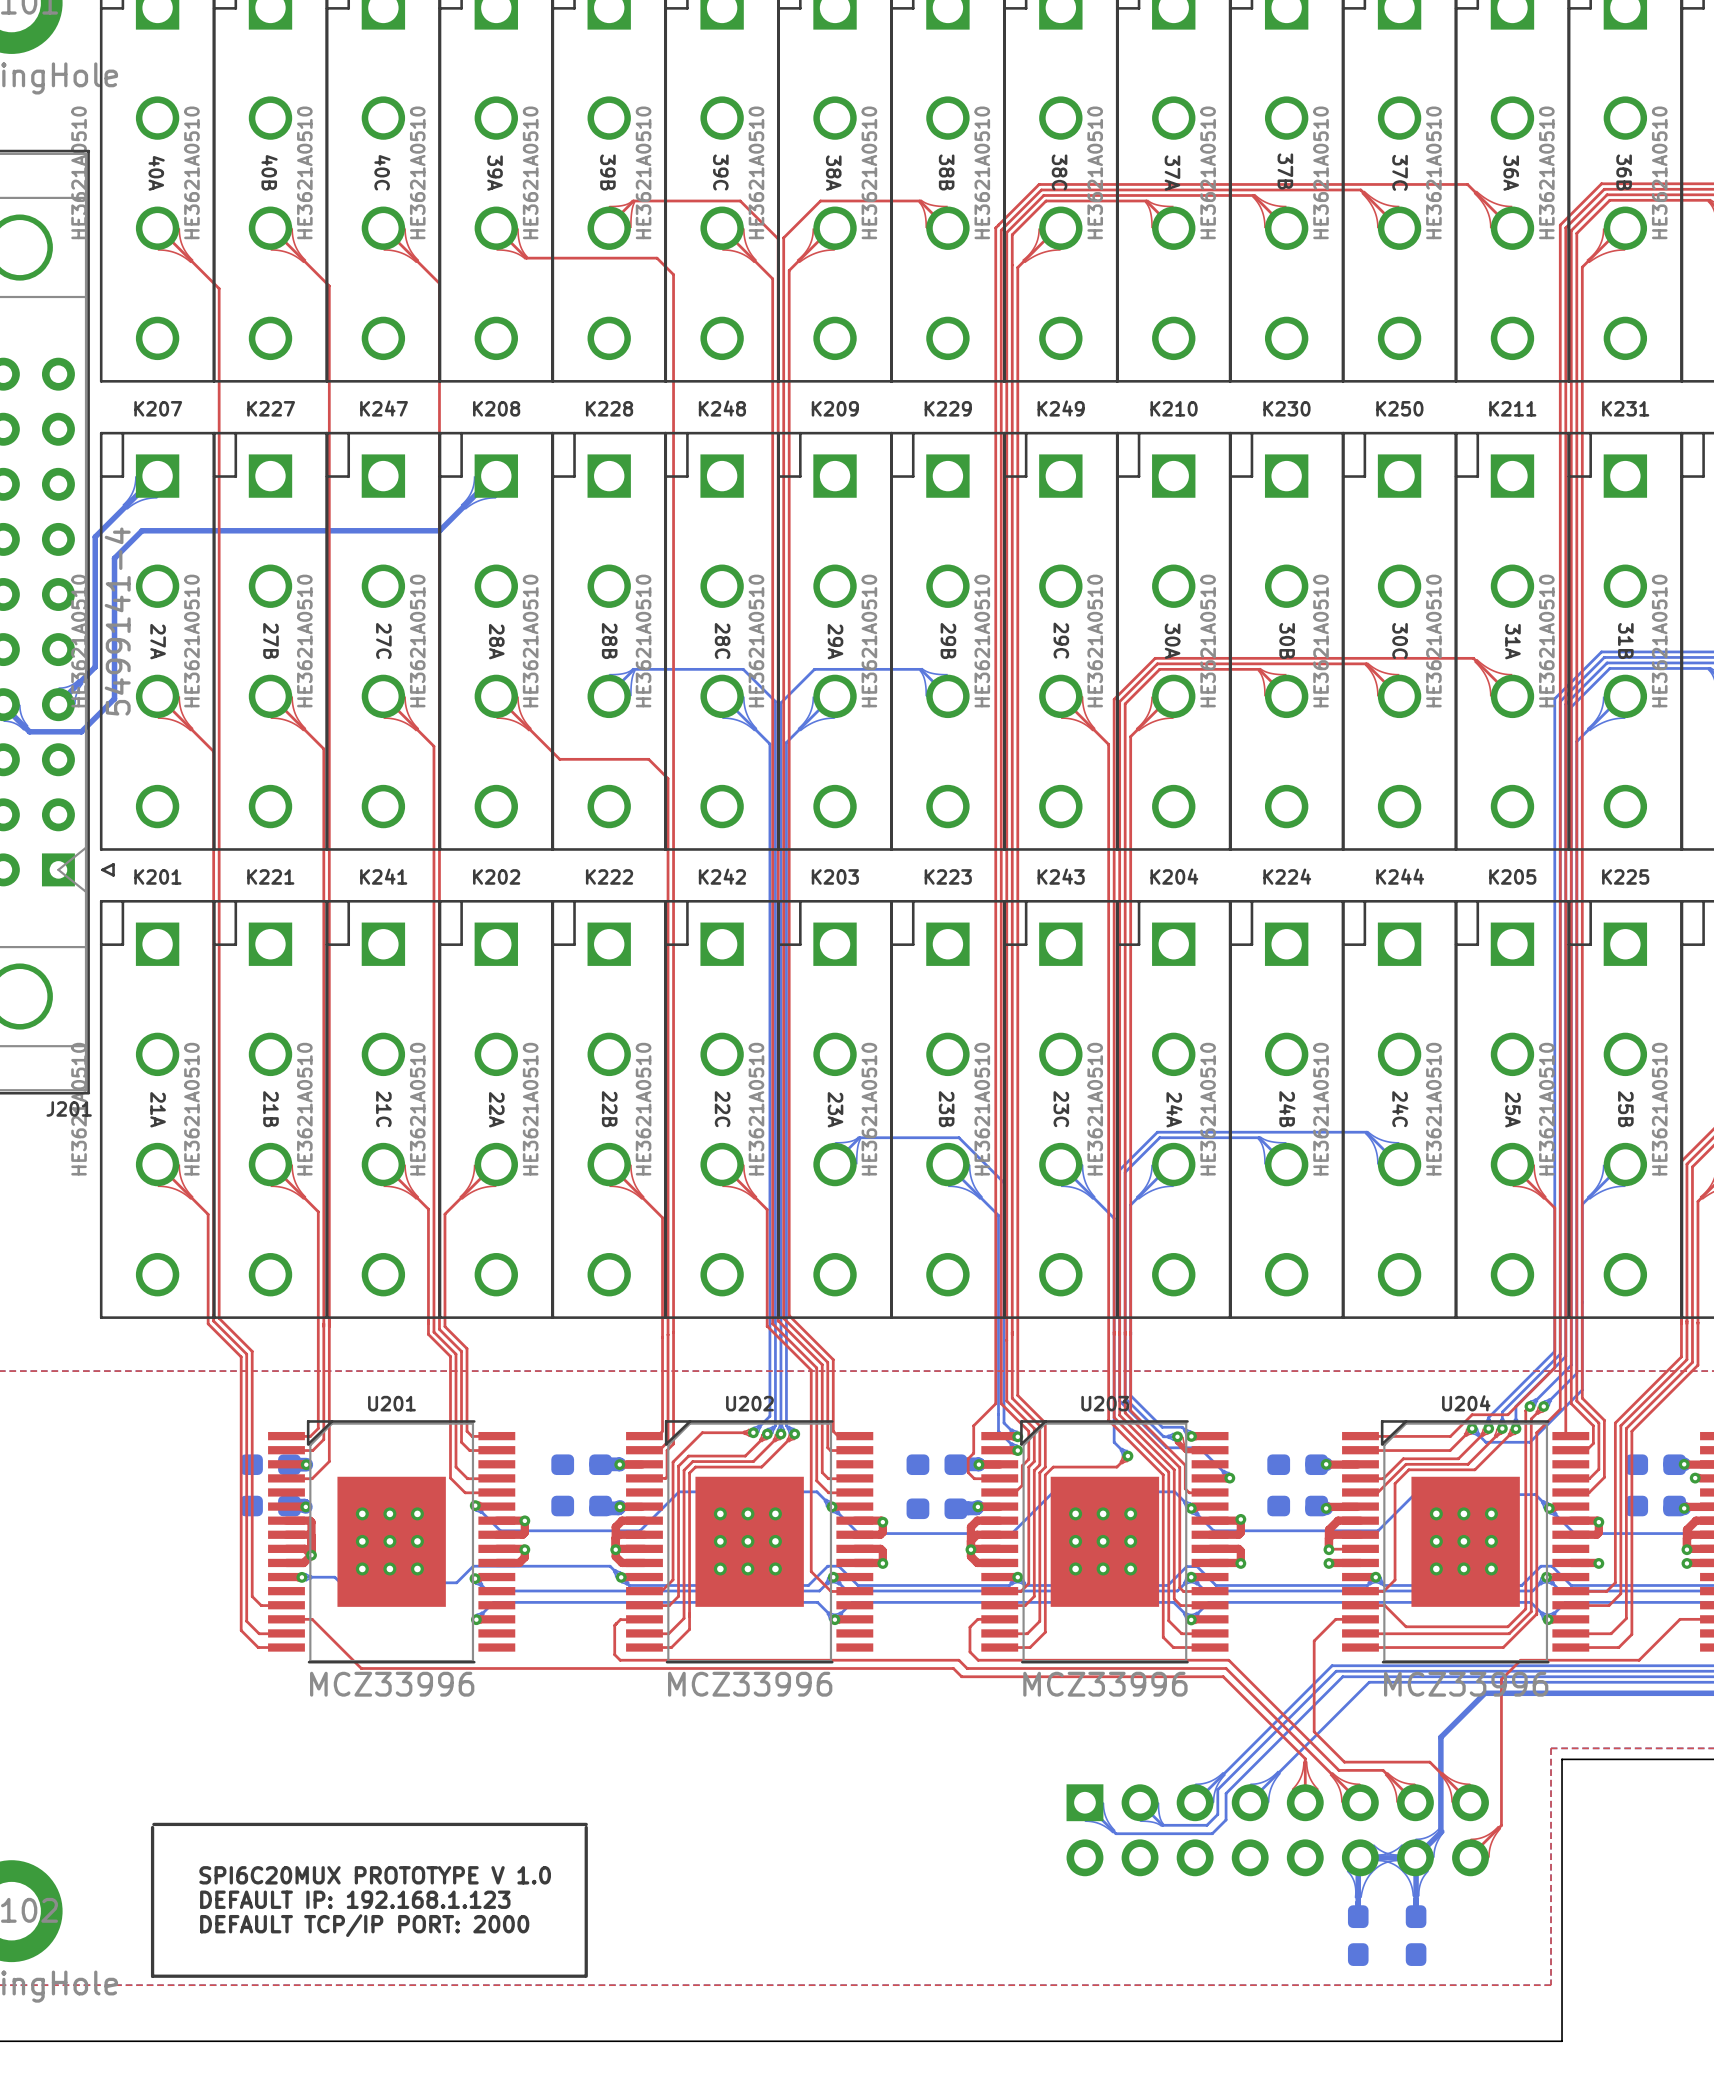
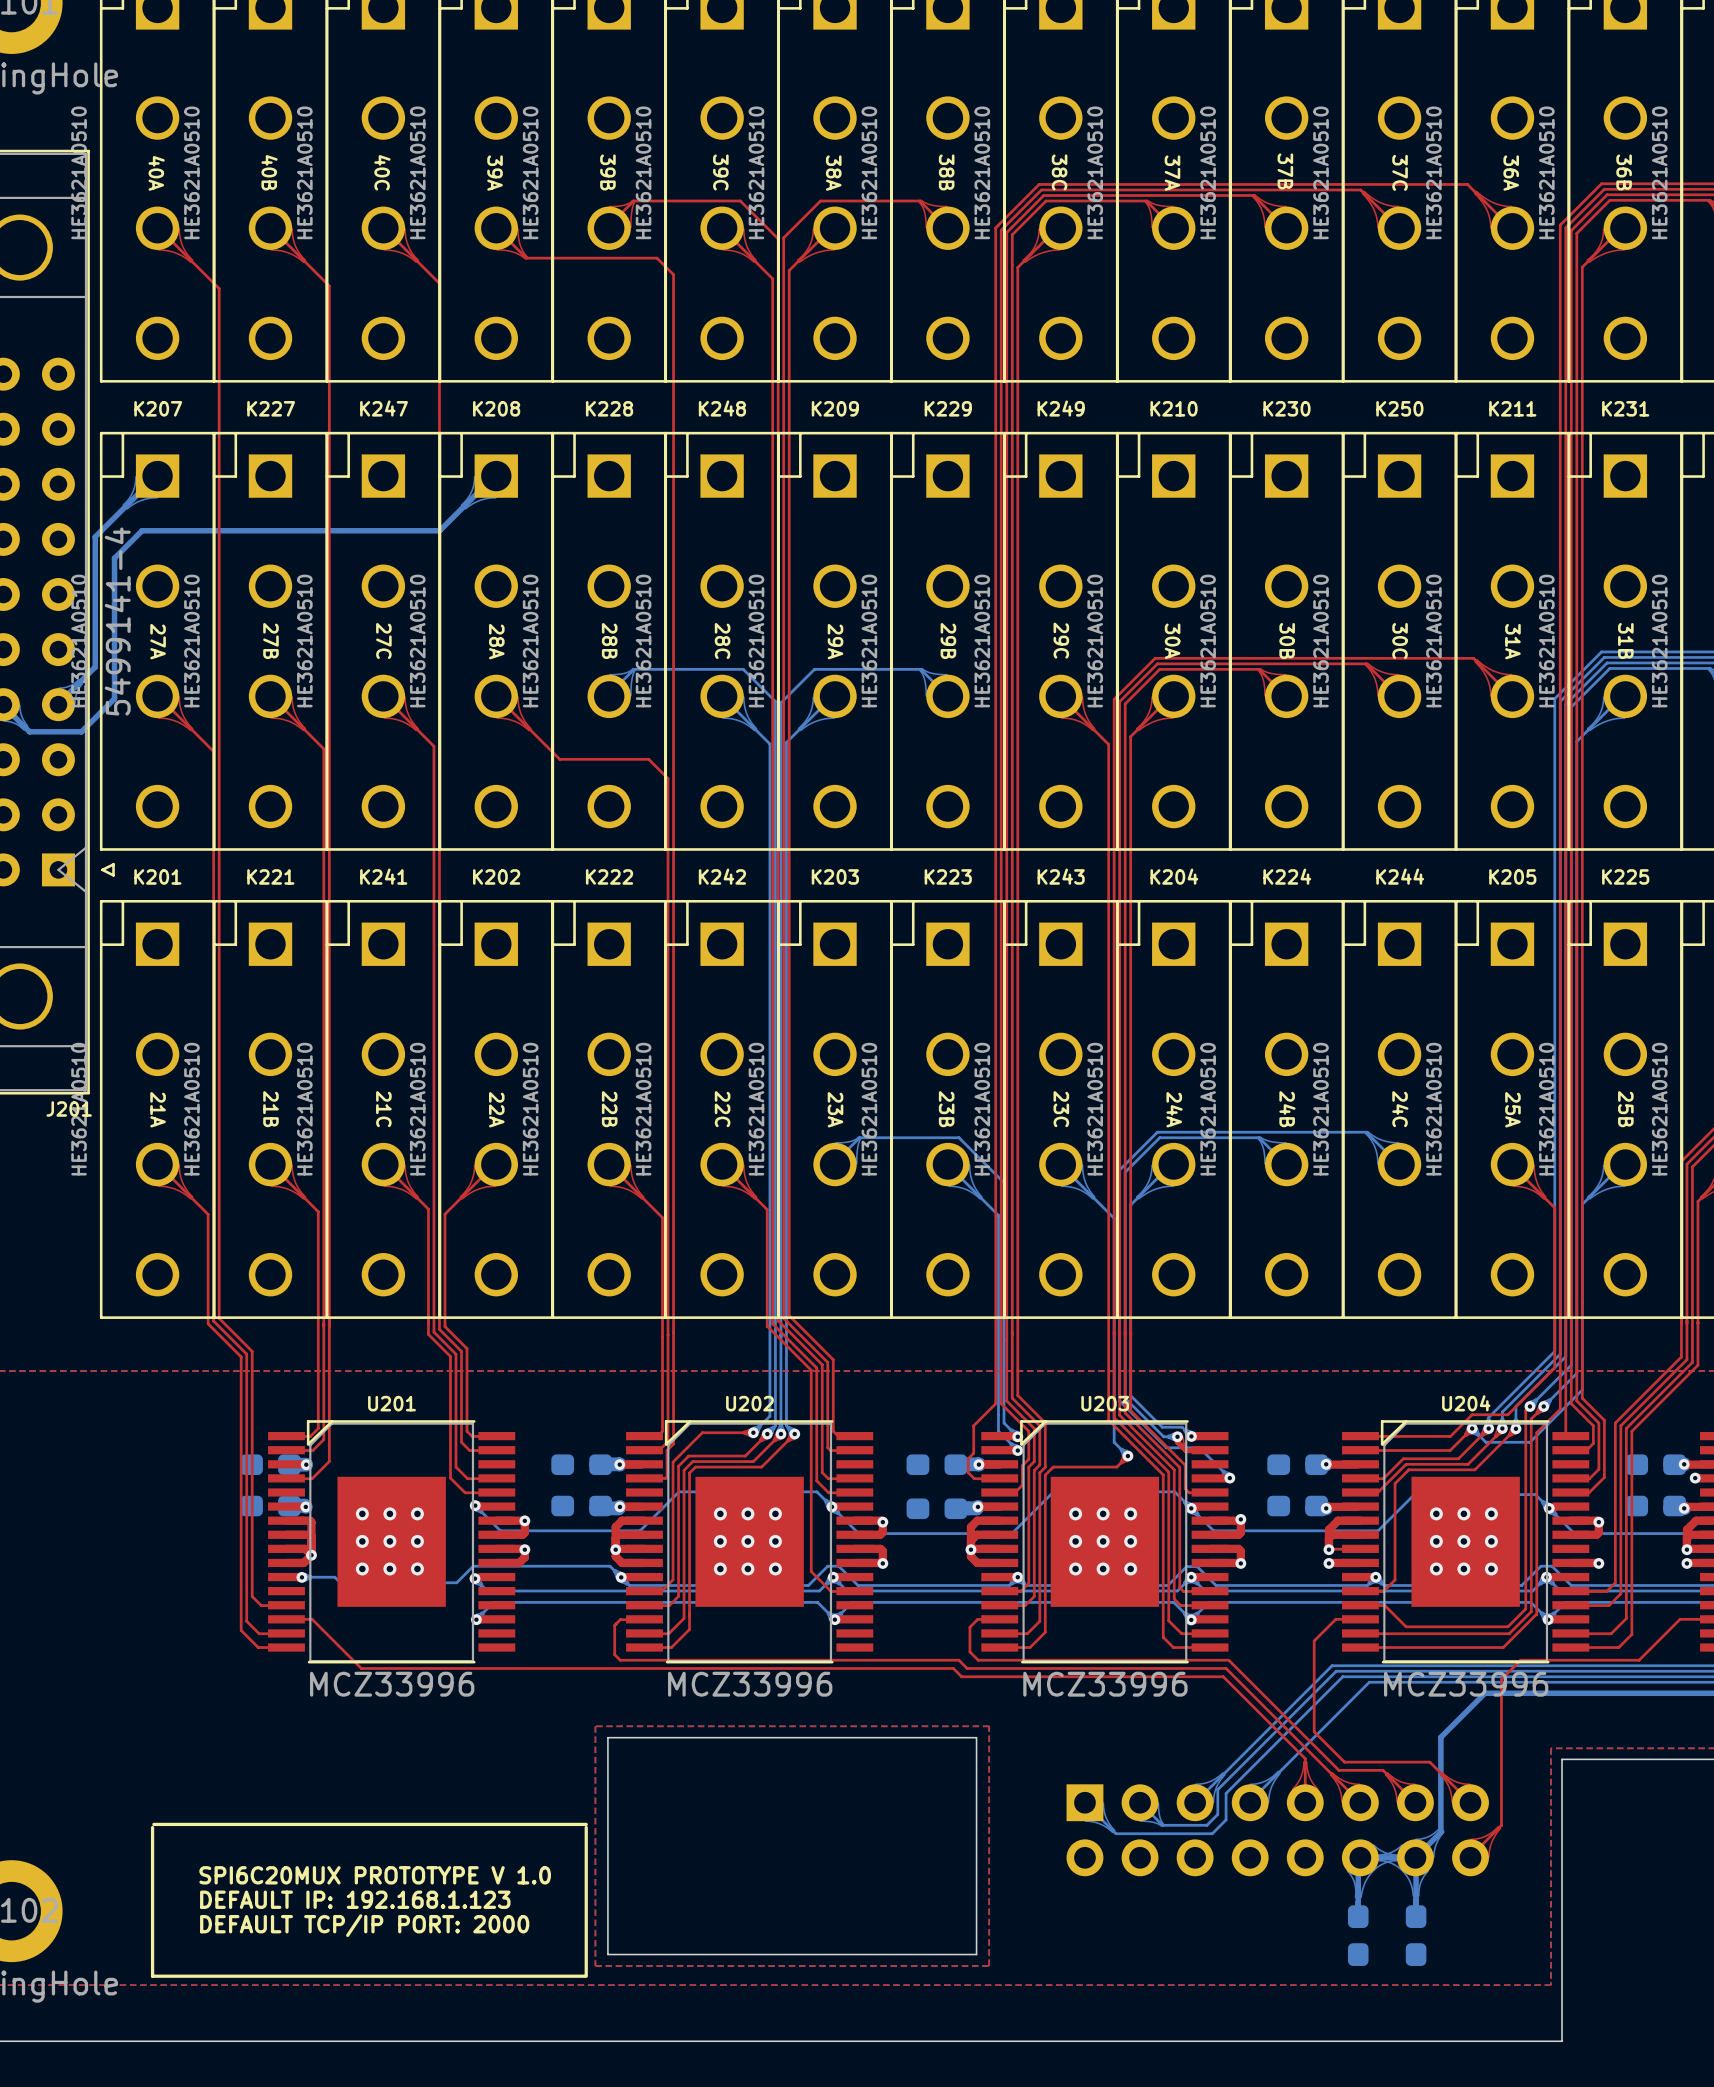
top zone outline: none -> (595, 1726) (595, 1965) (989, 1965) (989, 1726) (595, 1726)
board edge: none -> (607, 1737) (607, 1954) (976, 1954) (976, 1737) (607, 1737)

